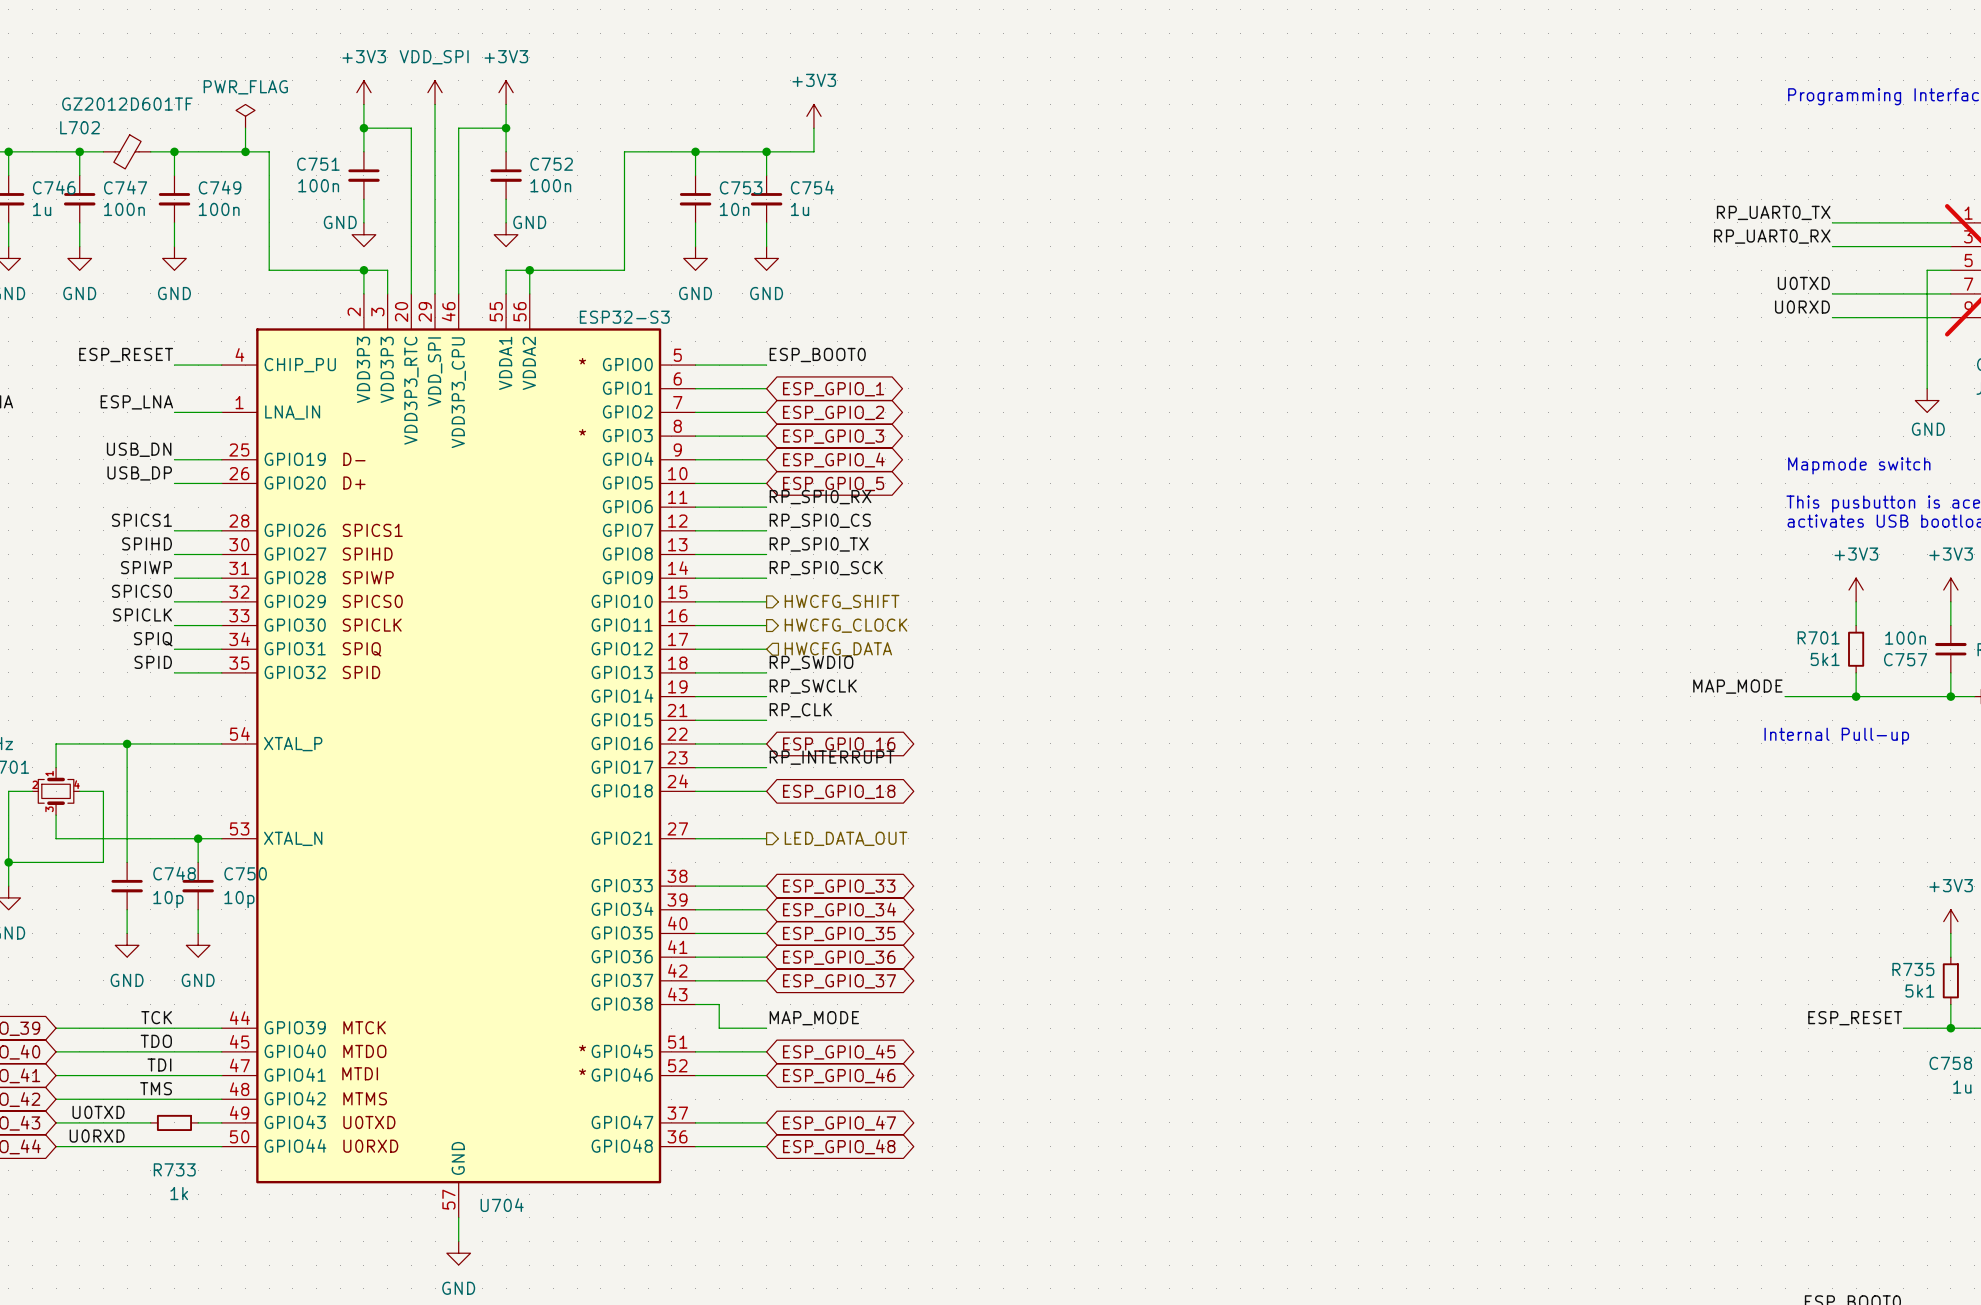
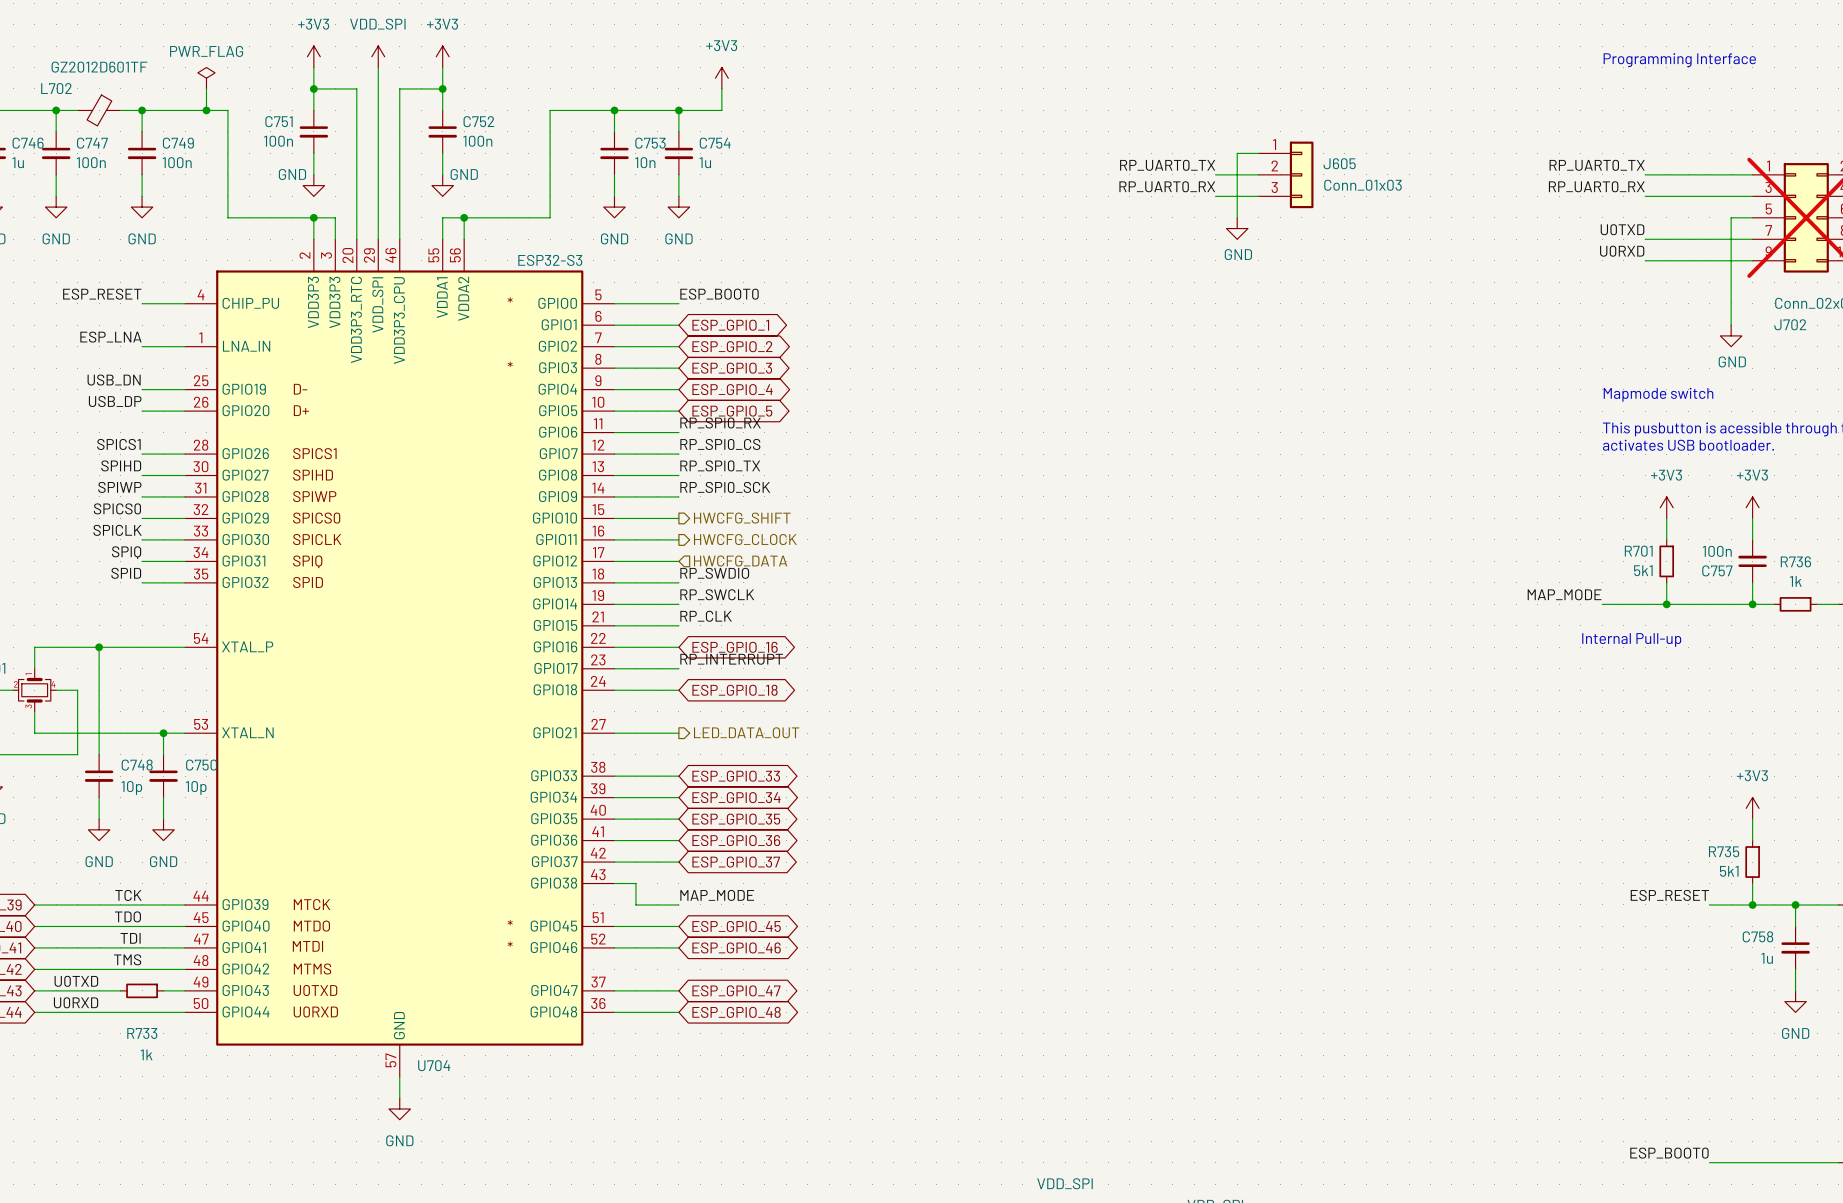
wire: none -> (1258, 153) (1237, 153) (1237, 217)
label: none -> RP_UART0_TX (1167, 165)
wire: none -> (1215, 174) (1258, 174)
J605: none -> Conn_01x03 (1286, 174)
label: none -> RP_UART0_RX (1167, 186)
wire: none -> (1215, 196) (1258, 196)
power symbol: none -> GND (1237, 228)

